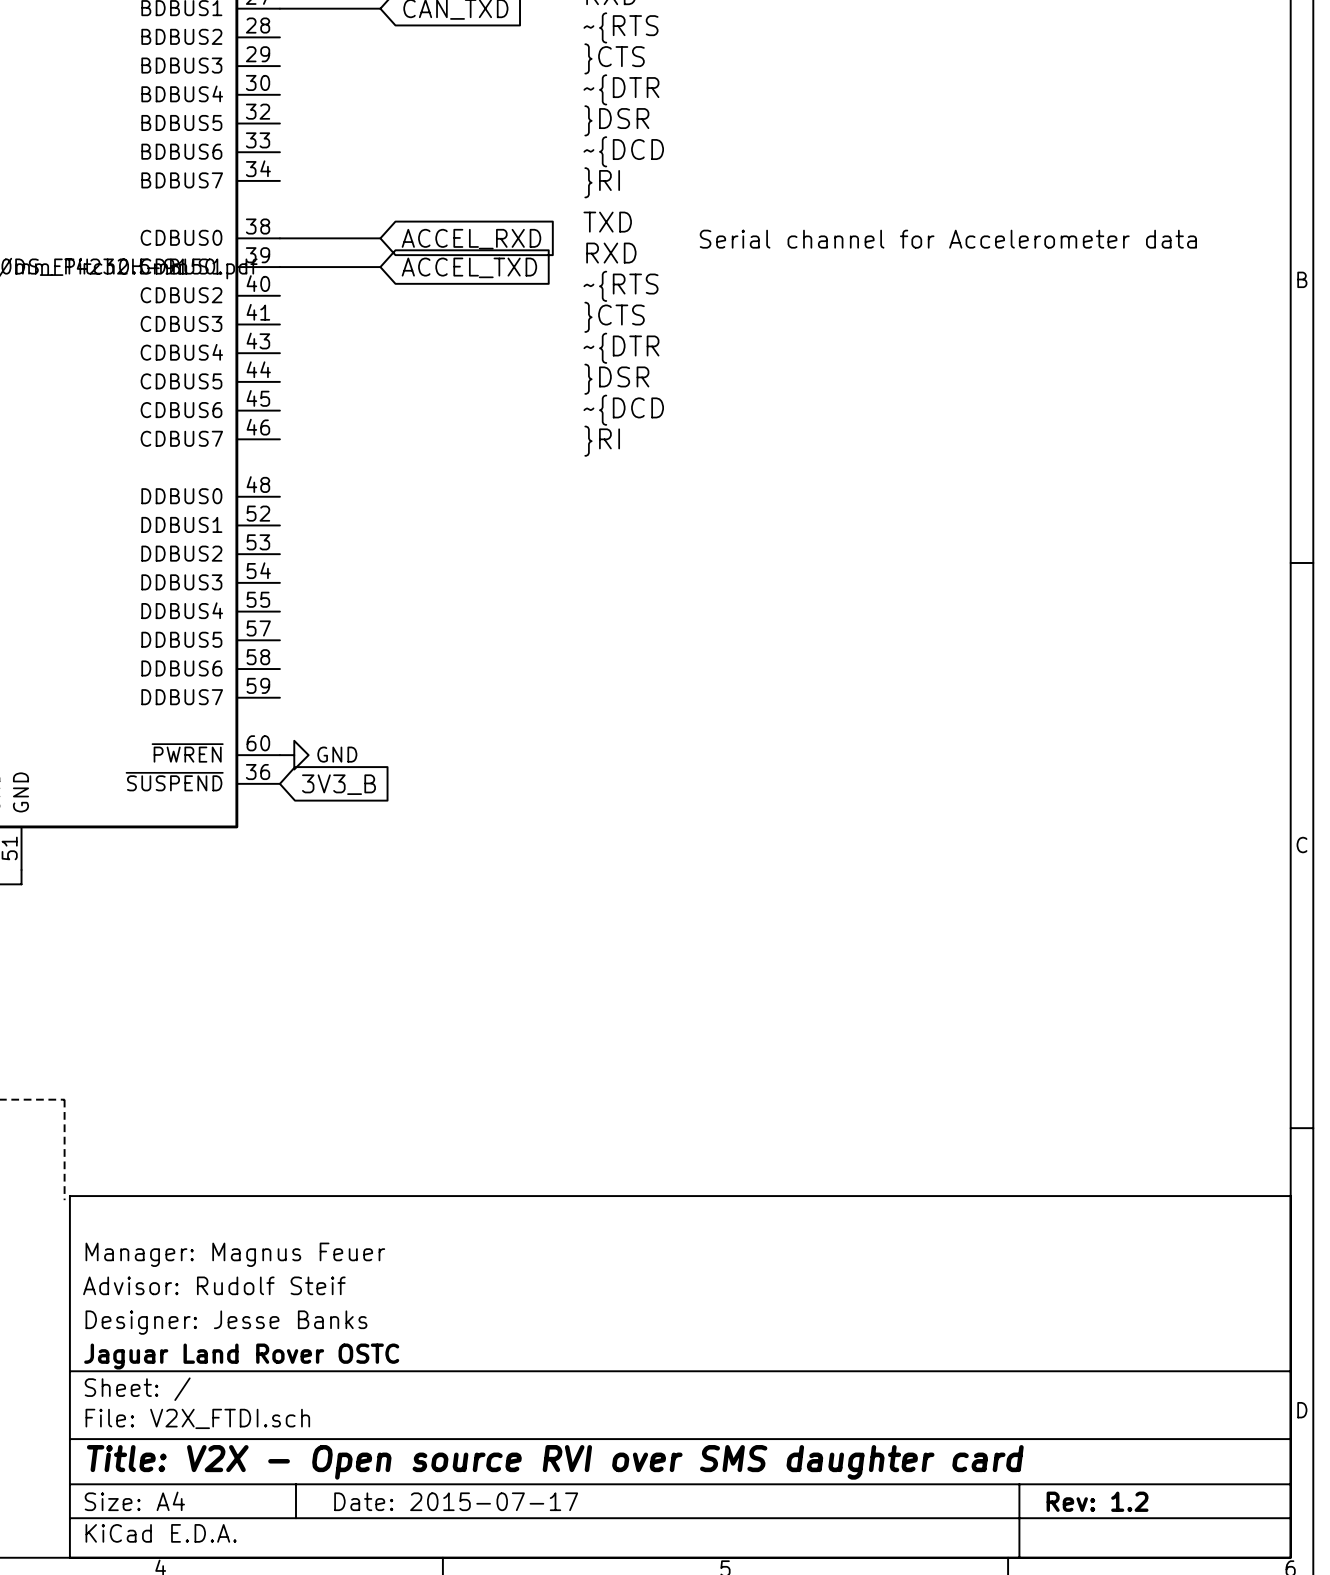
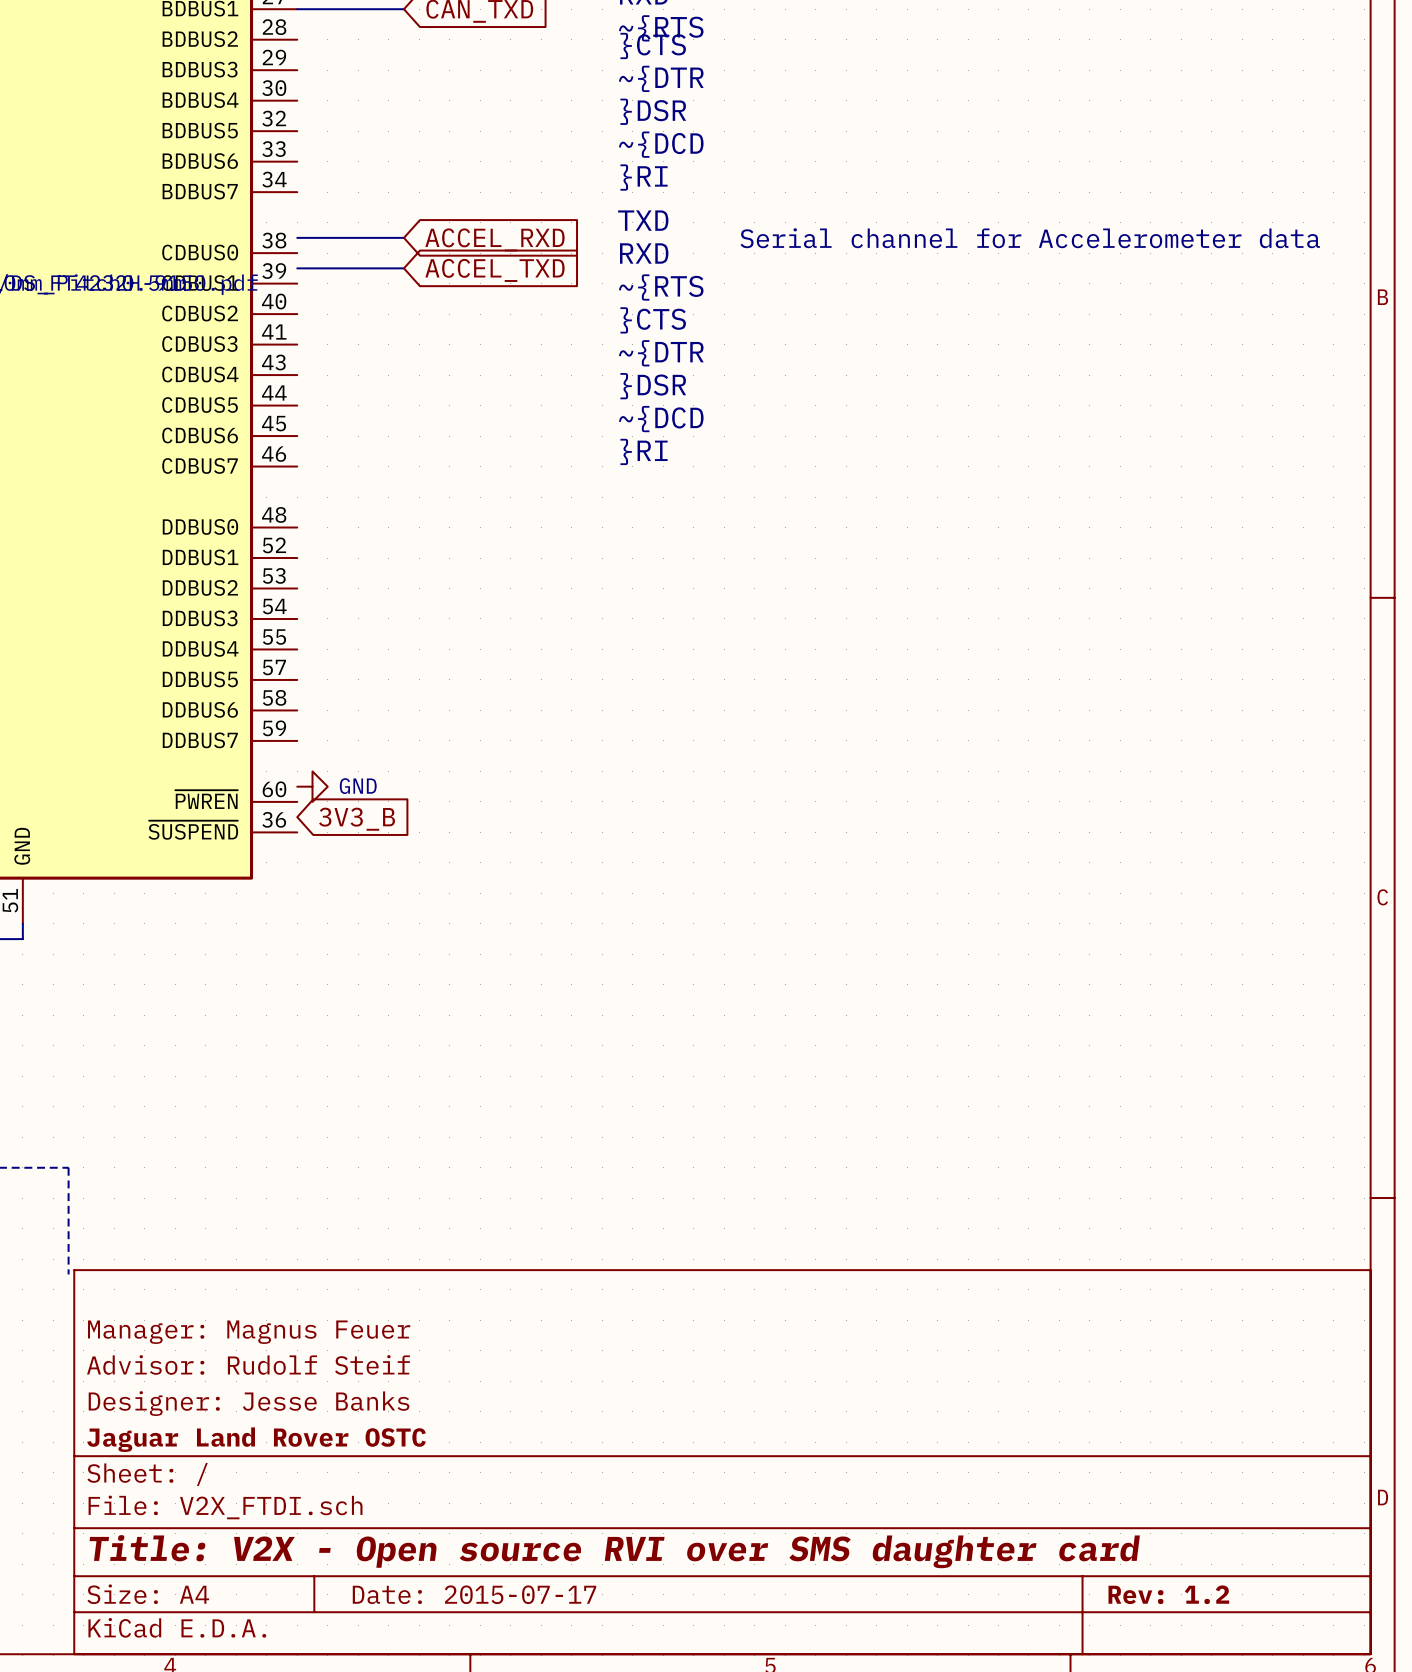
text position: }CTS (614, 58) -> }CTS (653, 45)
text position: ~{DTR (621, 89) -> ~{DTR (661, 78)
text position: }DSR (616, 120) -> }DSR (653, 111)
text position: ~{DCD (623, 151) -> ~{DCD (661, 144)
text position: }RI (602, 182) -> }RI (644, 177)
text position: TXD (607, 222) -> TXD (643, 220)
wire: (279, 238) (380, 238) -> (297, 237) (403, 237)
global label position: ACCEL_RXD (471, 239) -> ACCEL_RXD (494, 239)
text position: Serial channel for Accelerometer data (948, 239) -> Serial channel for Accelerometer data (1030, 238)
text position: RXD (611, 253) -> RXD (644, 253)
wire: (279, 267) (380, 267) -> (297, 268) (403, 268)
global label position: ACCEL_TXD (469, 267) -> ACCEL_TXD (494, 270)
text position: ~{RTS (620, 286) -> ~{RTS (661, 287)
text position: }CTS (614, 317) -> }CTS (653, 320)
text position: ~{DTR (621, 348) -> ~{DTR (661, 353)
text position: }DSR (616, 379) -> }DSR (653, 386)
text position: ~{DCD (623, 410) -> ~{DCD (661, 419)
text position: }RI (602, 441) -> }RI (644, 451)
power symbol position: GND (294, 755) -> GND (312, 786)
global label position: 3V3_B (338, 784) -> 3V3_B (357, 819)

